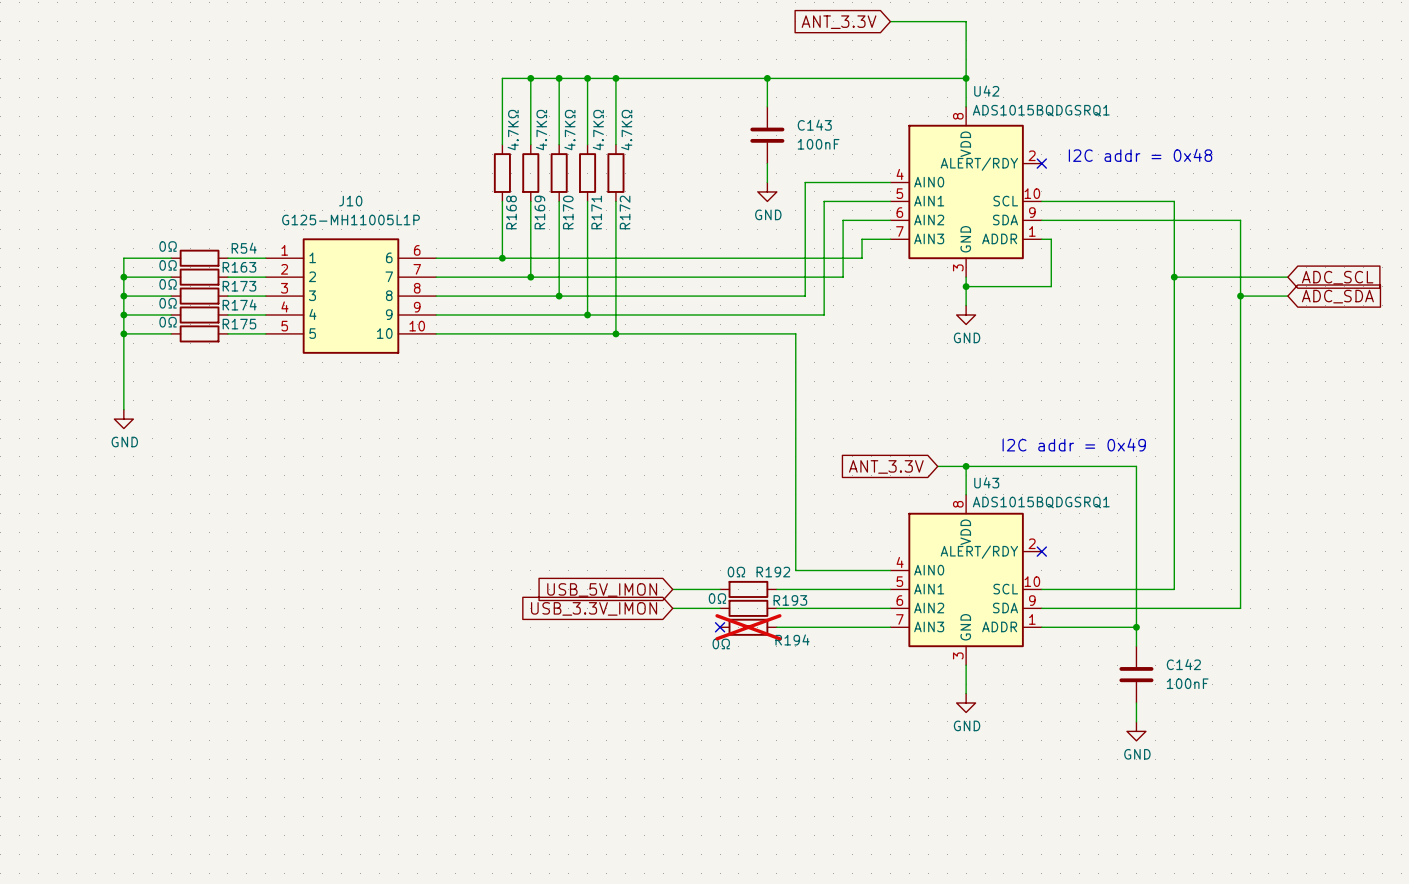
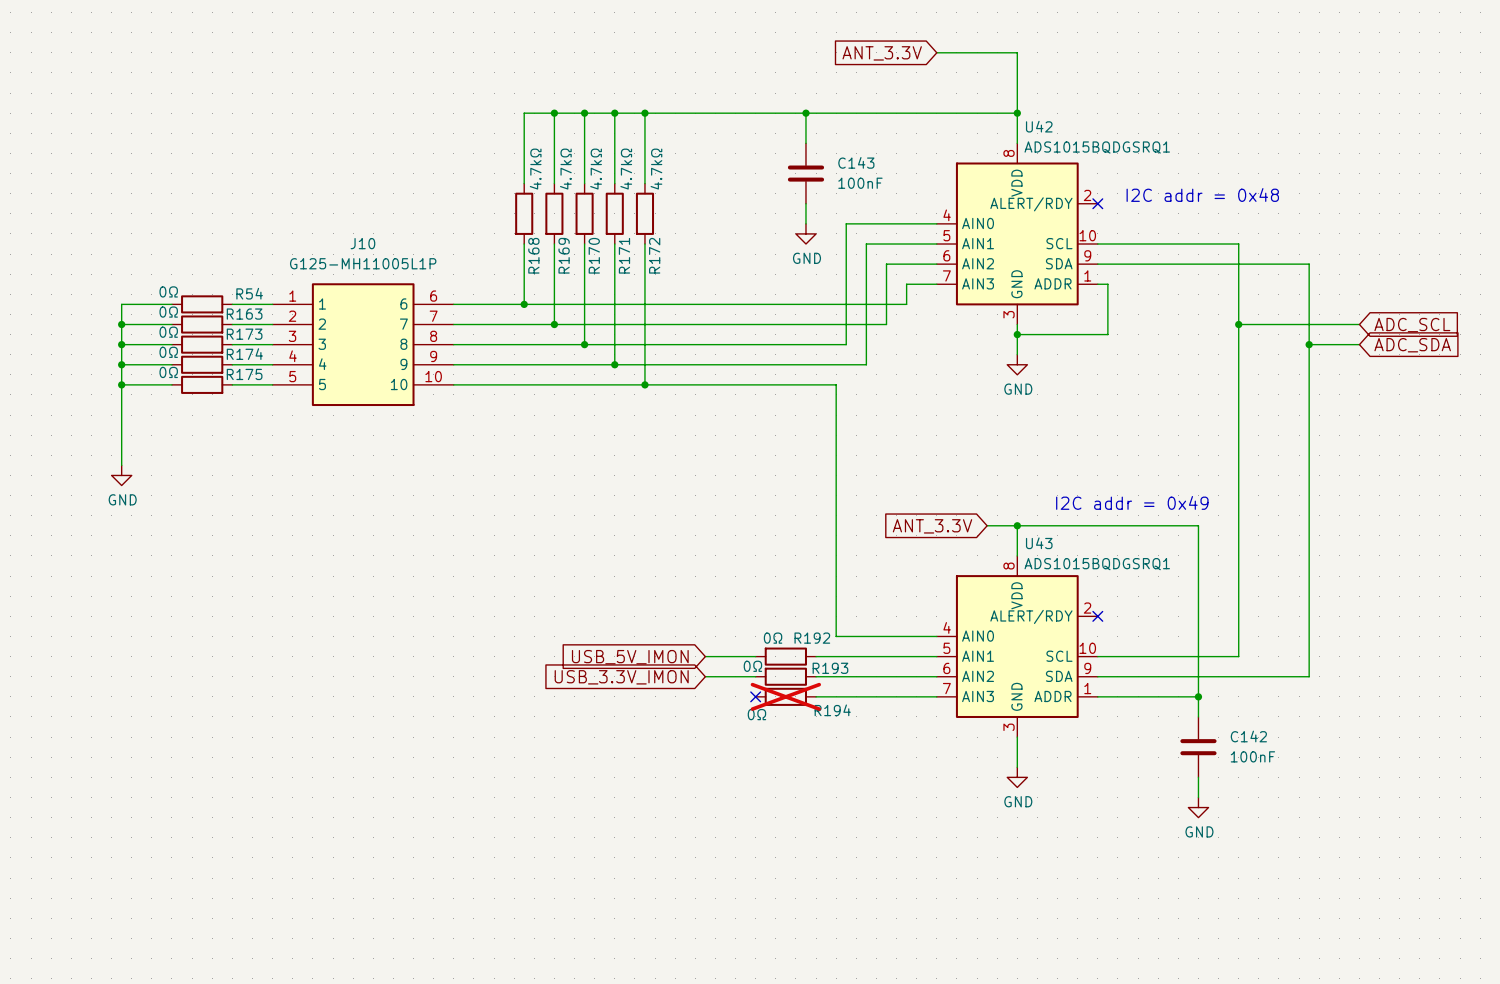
R168 value: 4.7KΩ (513, 130) -> 4.7kΩ (535, 169)
R169 value: 4.7KΩ (541, 130) -> 4.7kΩ (565, 169)
R170 value: 4.7KΩ (569, 130) -> 4.7kΩ (596, 169)
R171 value: 4.7KΩ (598, 130) -> 4.7kΩ (626, 169)
R172 value: 4.7KΩ (626, 130) -> 4.7kΩ (656, 169)

